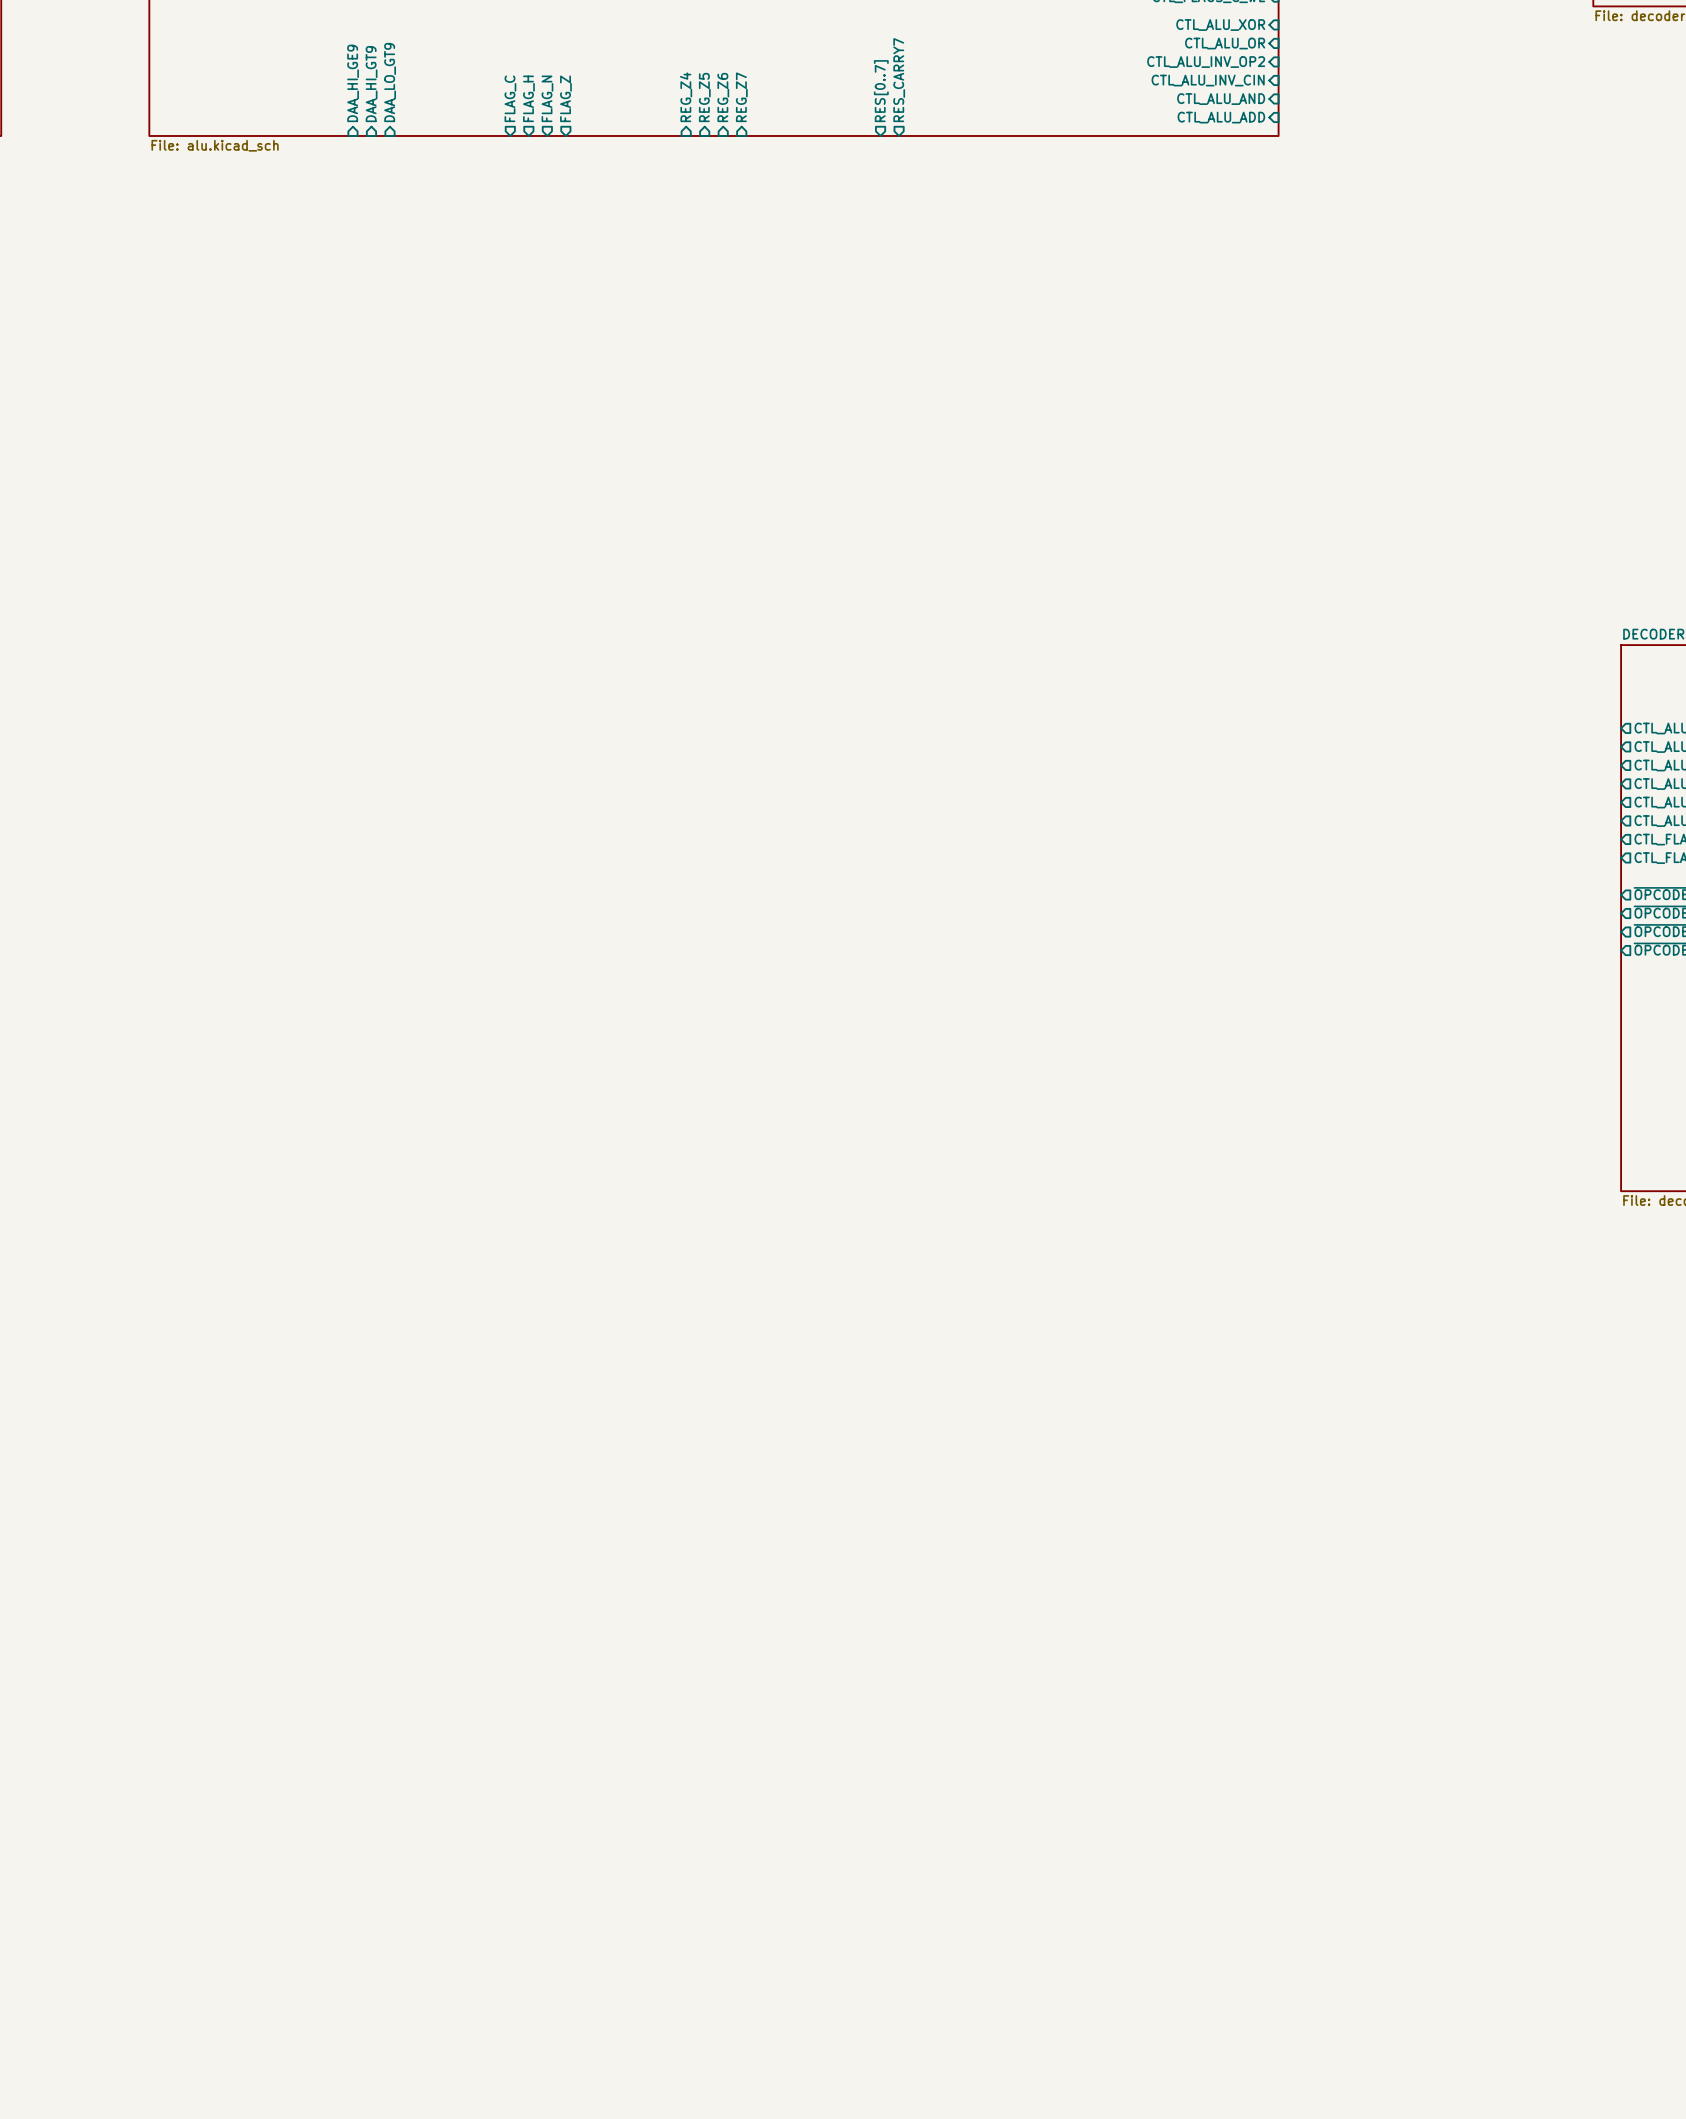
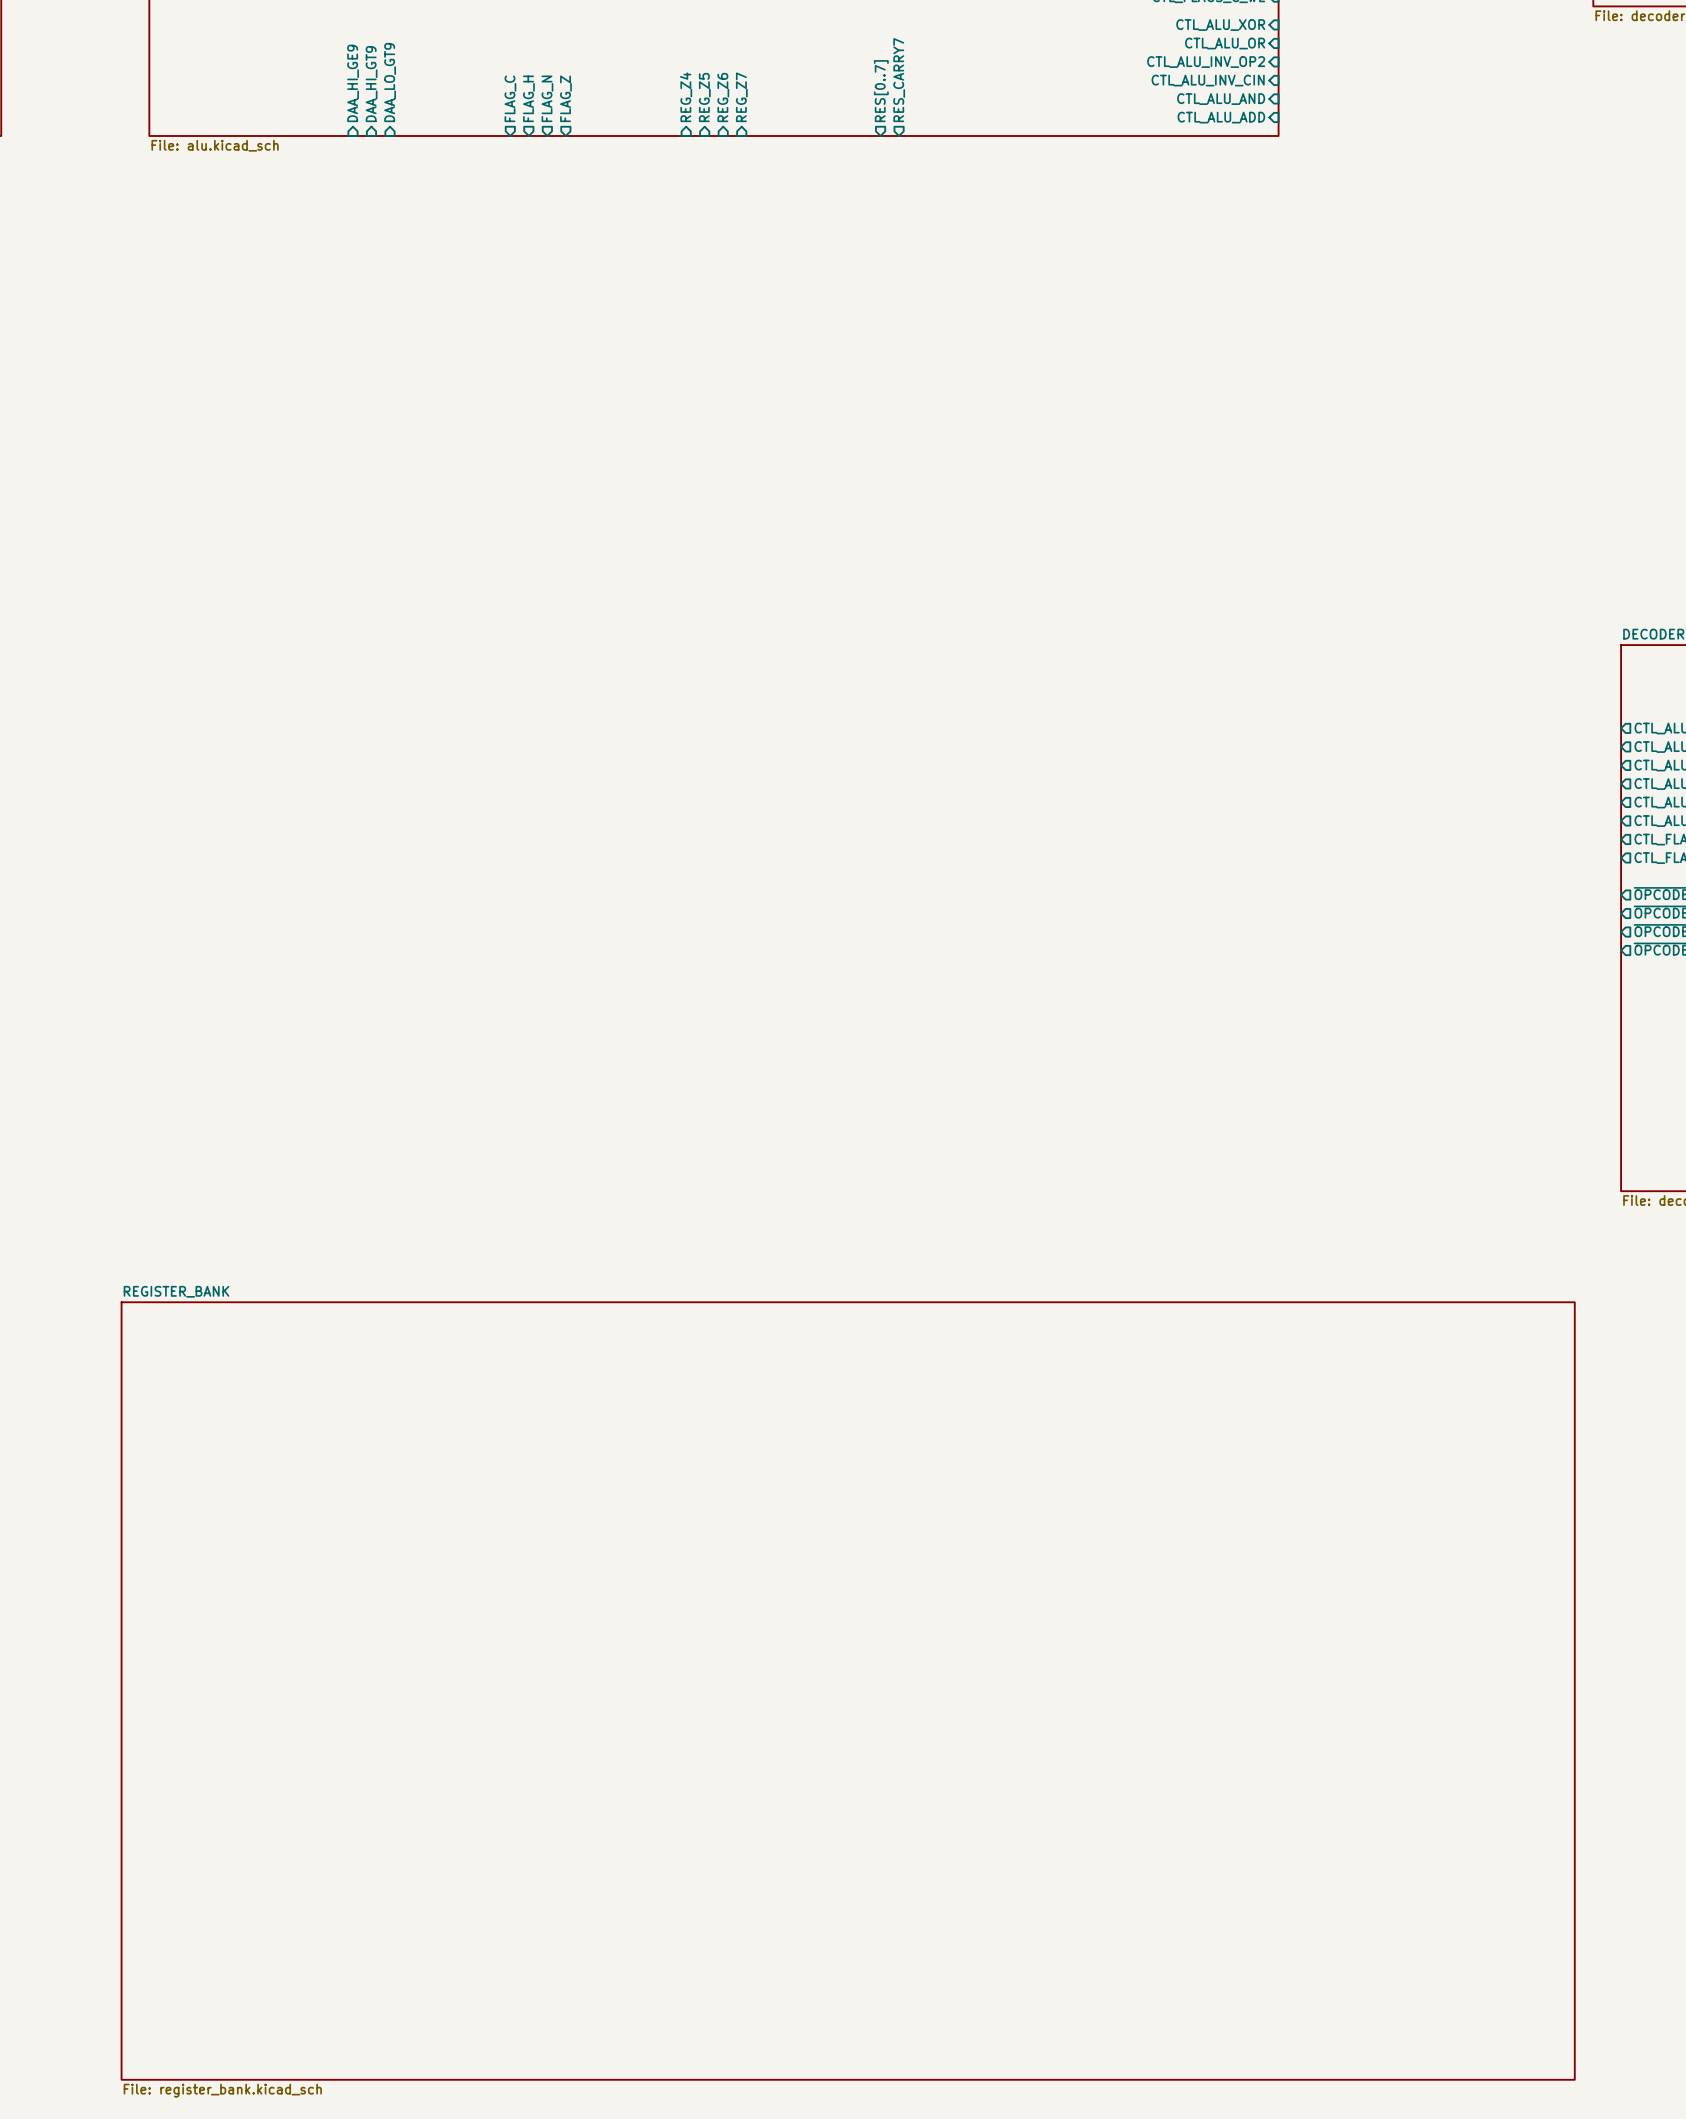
sheet REGISTER_BANK: none -> File: register_bank.kicad_sch (848, 1691)

